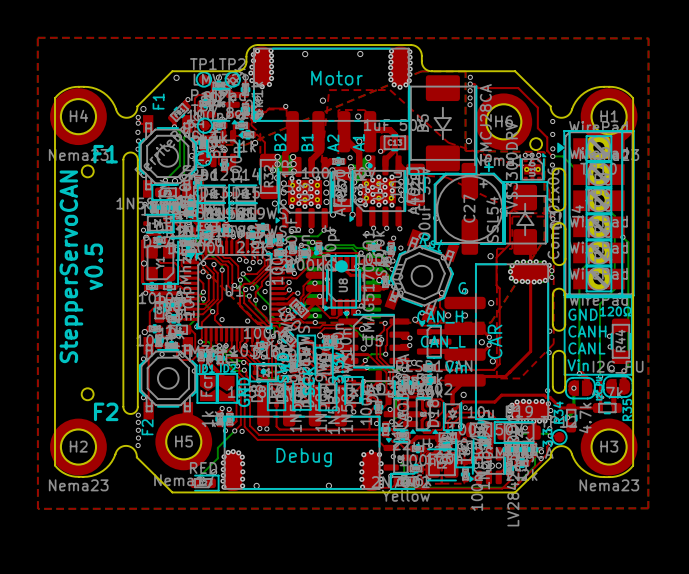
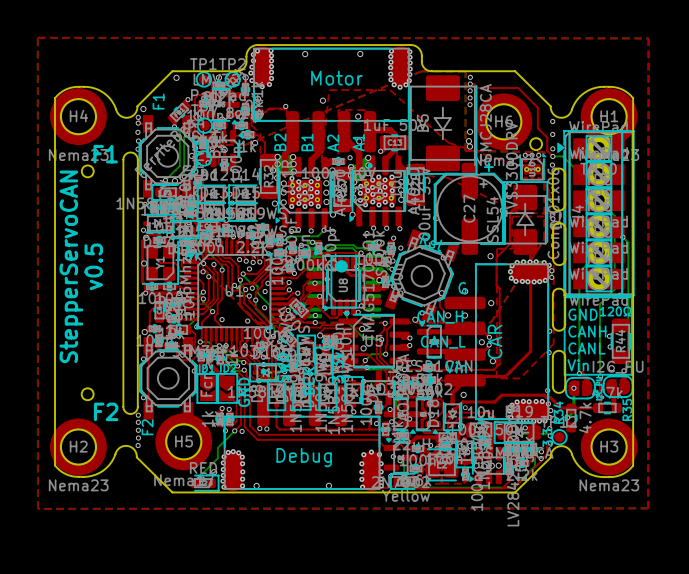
via: none -> (470, 131)
via: none -> (469, 146)

